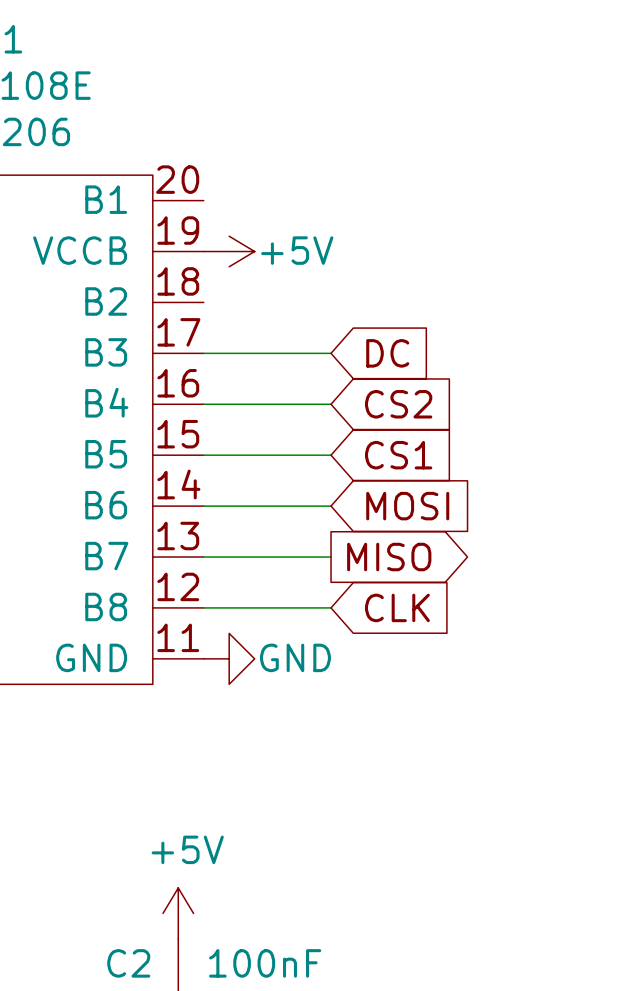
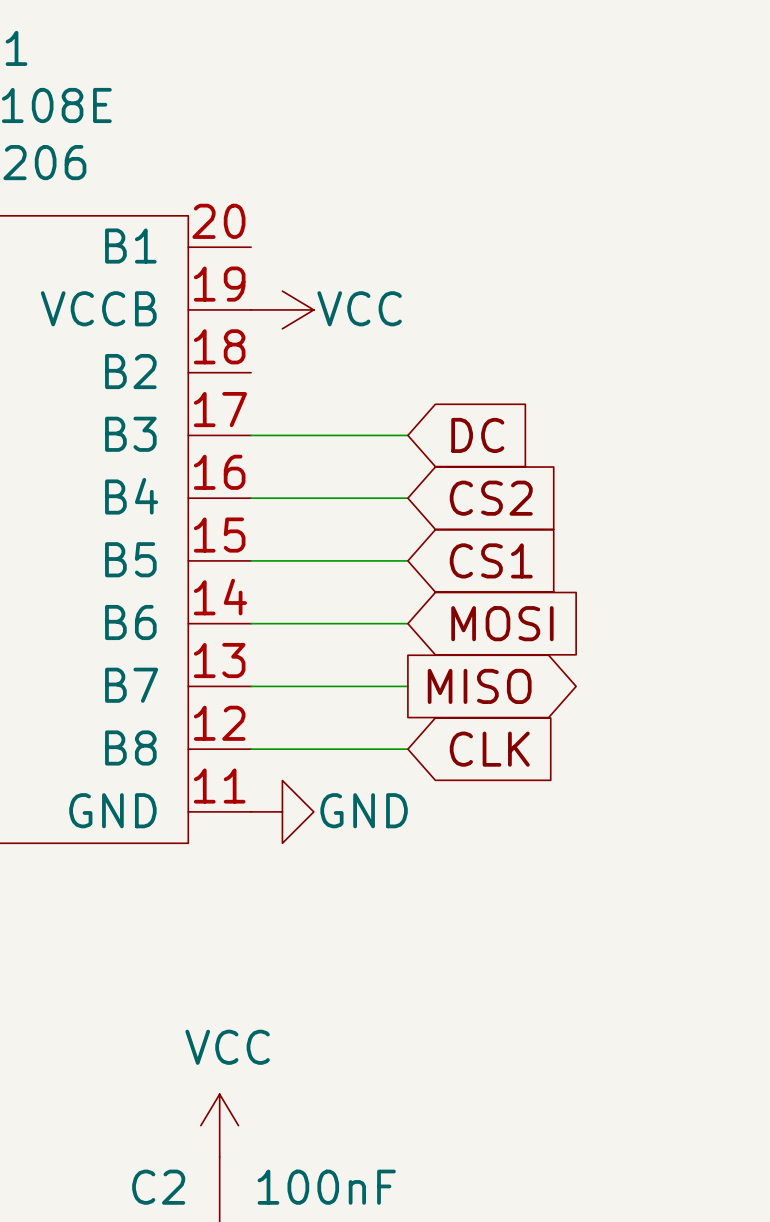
power symbol: +5V (229, 251) -> VCC (282, 309)
power symbol: +5V (178, 913) -> VCC (219, 1125)

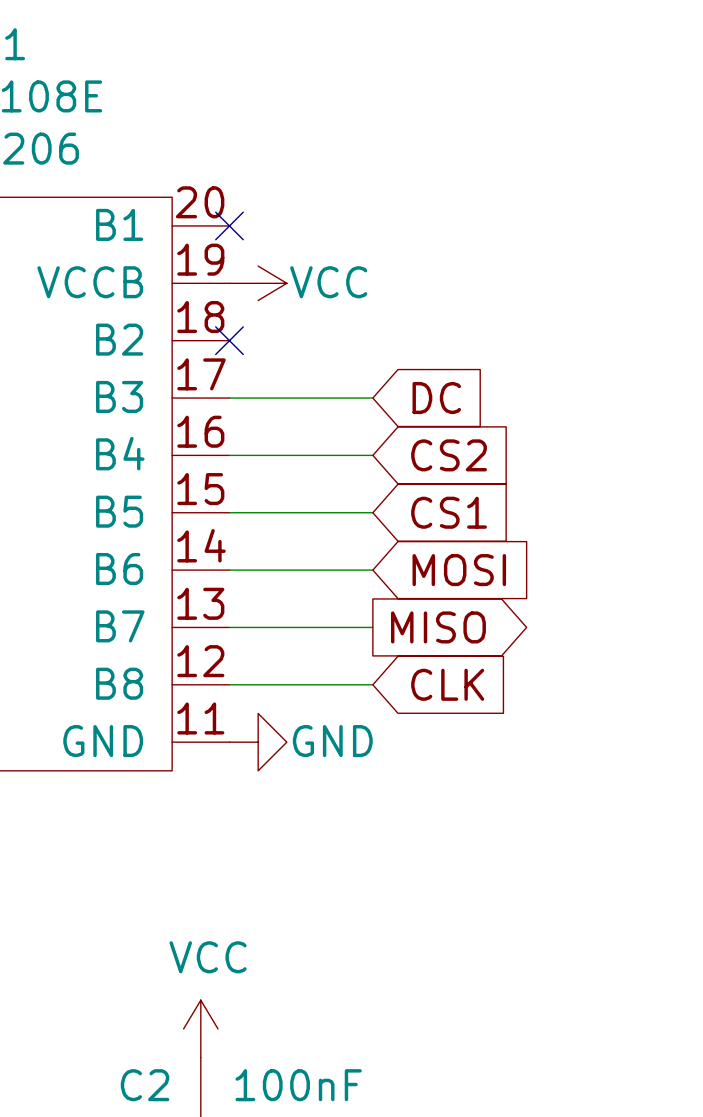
no-connect mark: none -> (229, 225)
no-connect mark: none -> (229, 340)

